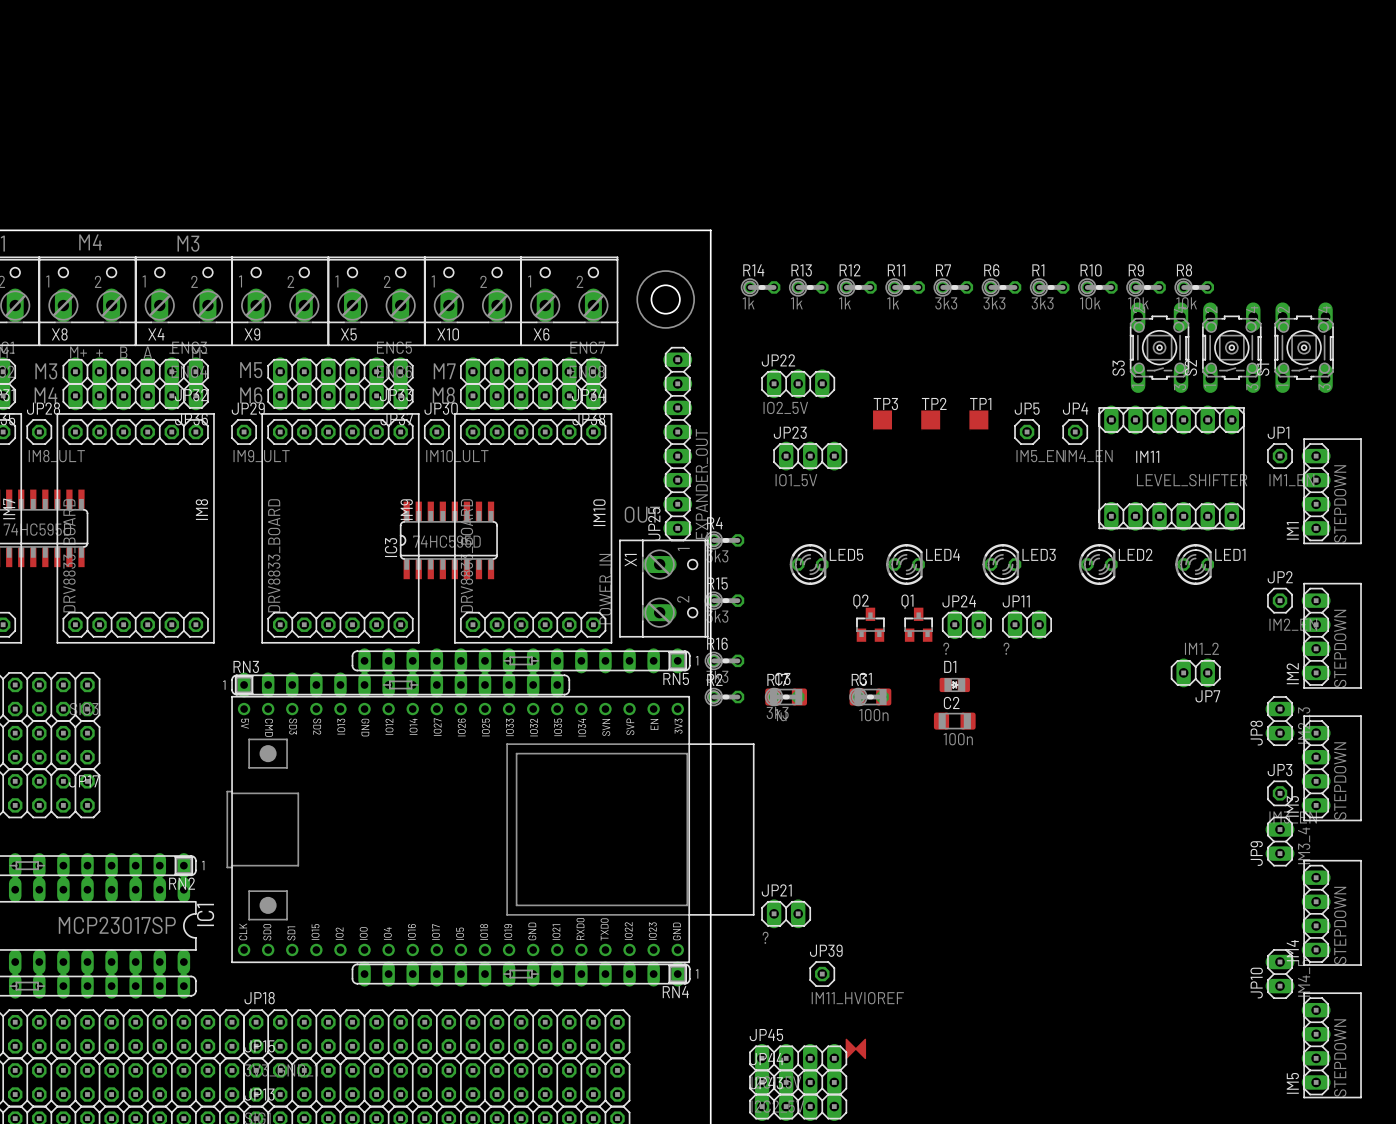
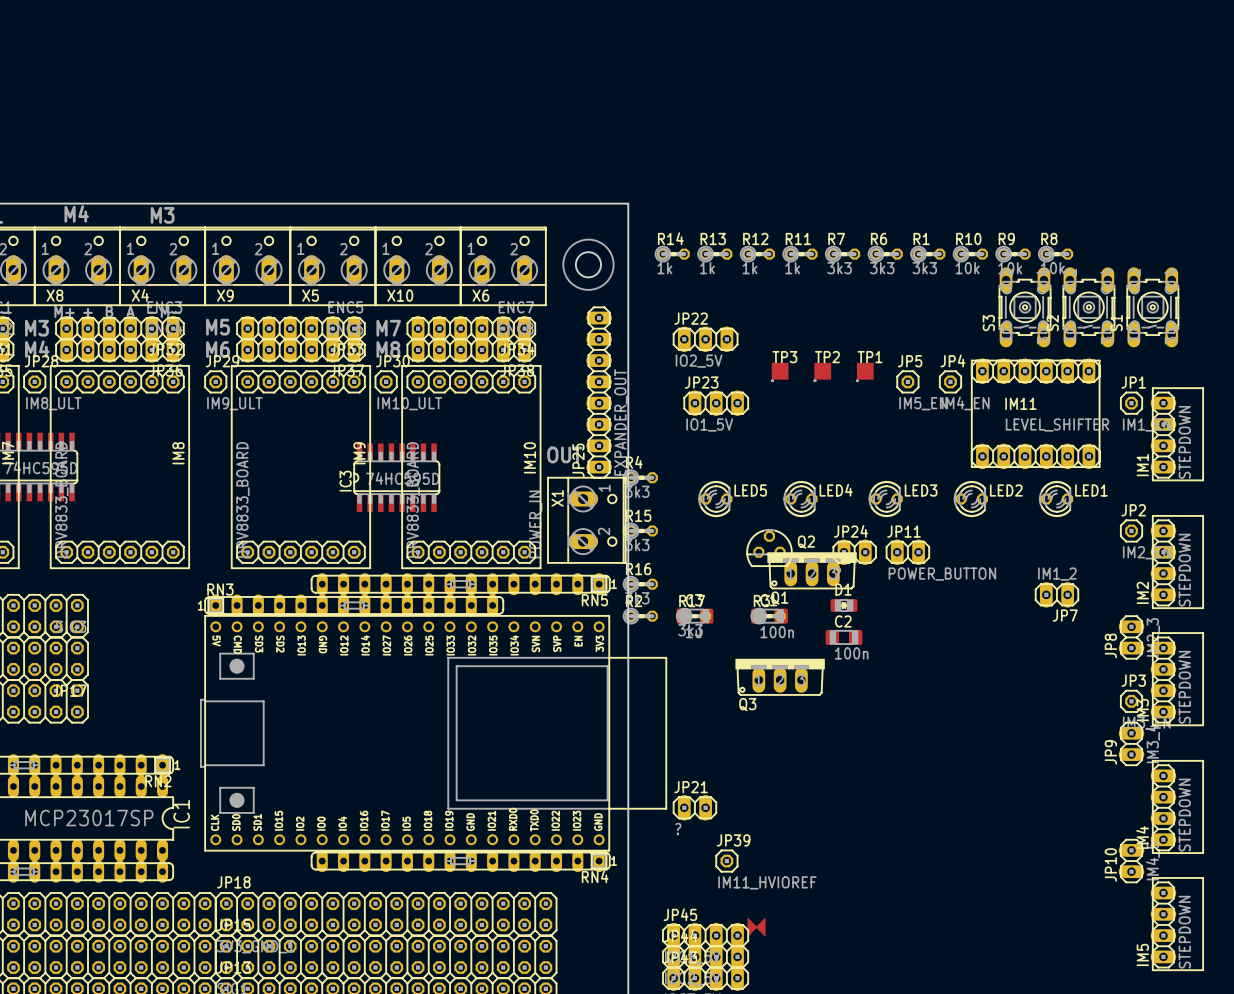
Q2 name position: Q2 (861, 601) -> Q2 (806, 542)
Q1 name position: Q1 (907, 601) -> Q1 (779, 598)
Q2 footprint: [856, 607, 885, 642] -> [746, 529, 793, 567]
Q1 footprint: [904, 607, 933, 642] -> [767, 552, 857, 589]
JP11 value: ? (1006, 648) -> POWER_BUTTON (942, 574)
Q3: none -> (780, 677)

